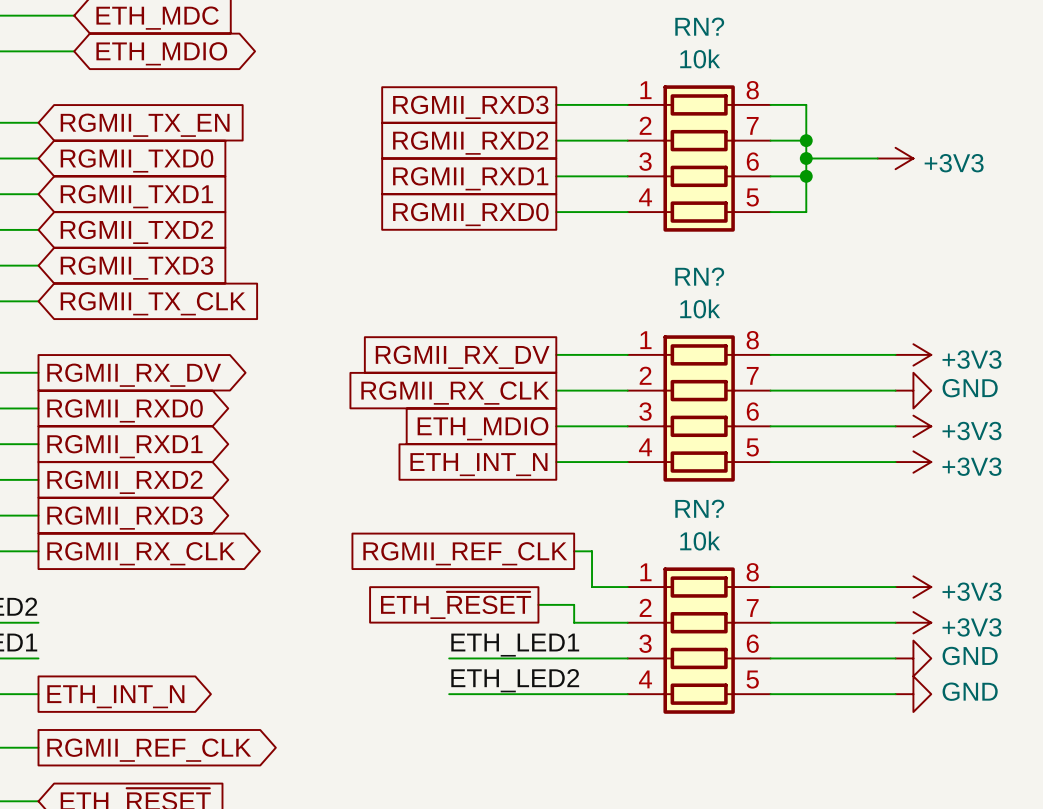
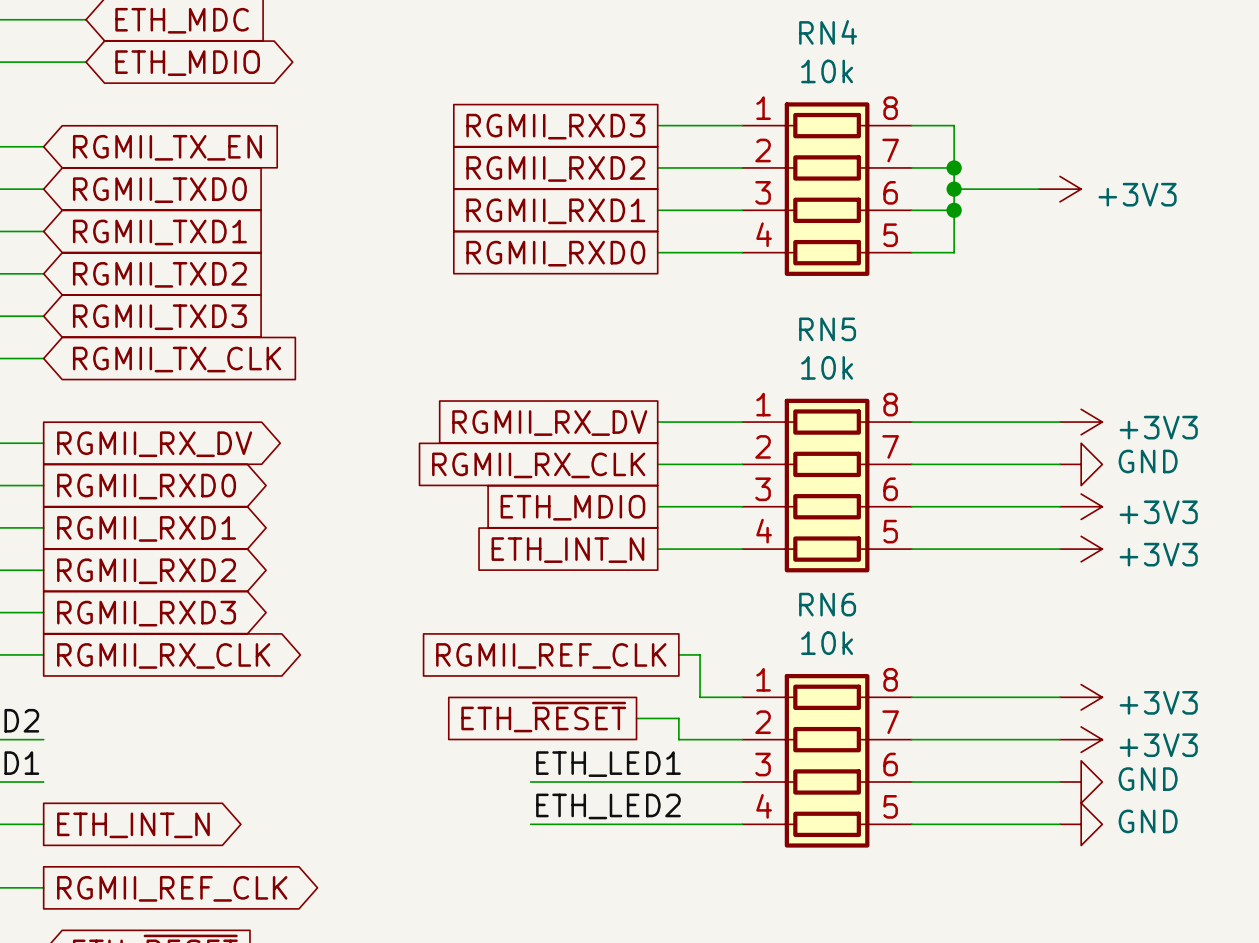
RN? name: RN? (699, 26) -> RN4 (828, 32)
RN? name: RN? (699, 276) -> RN5 (827, 329)
RN? name: RN? (699, 508) -> RN6 (827, 604)

